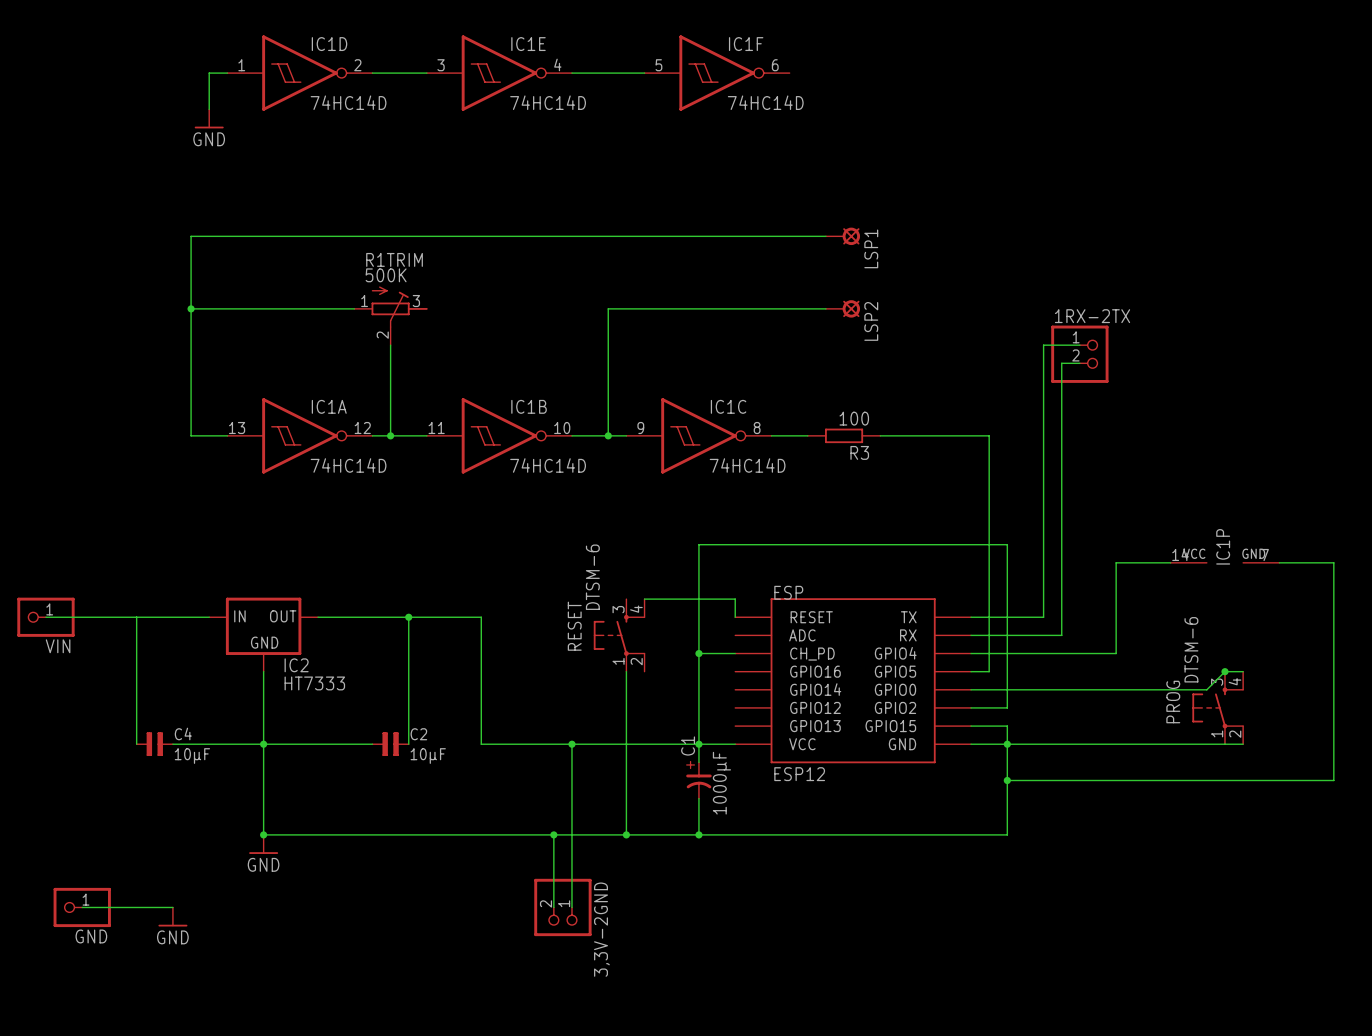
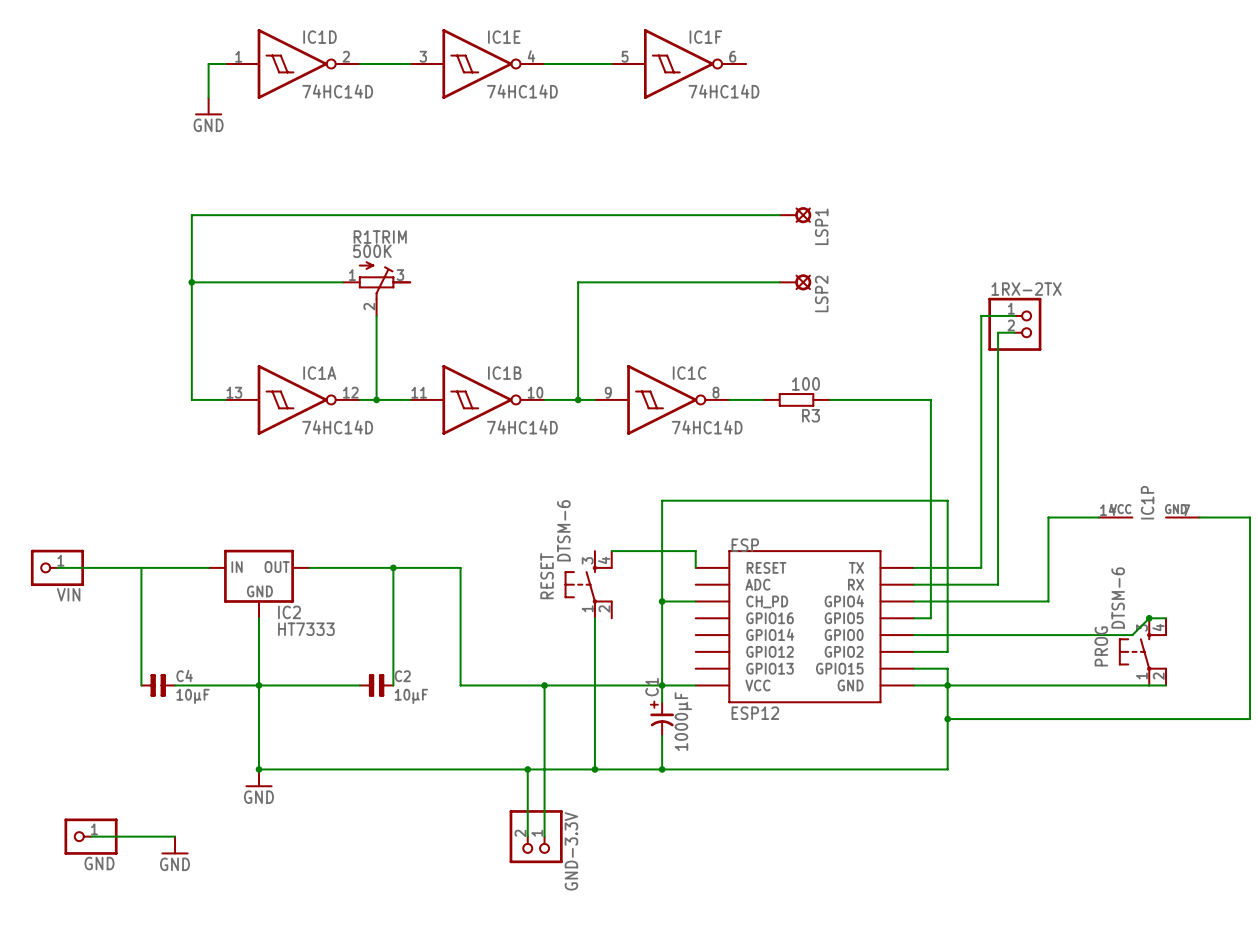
3,3V-2GND name: 3,3V-2GND (601, 929) -> GND-3.3V (571, 851)

